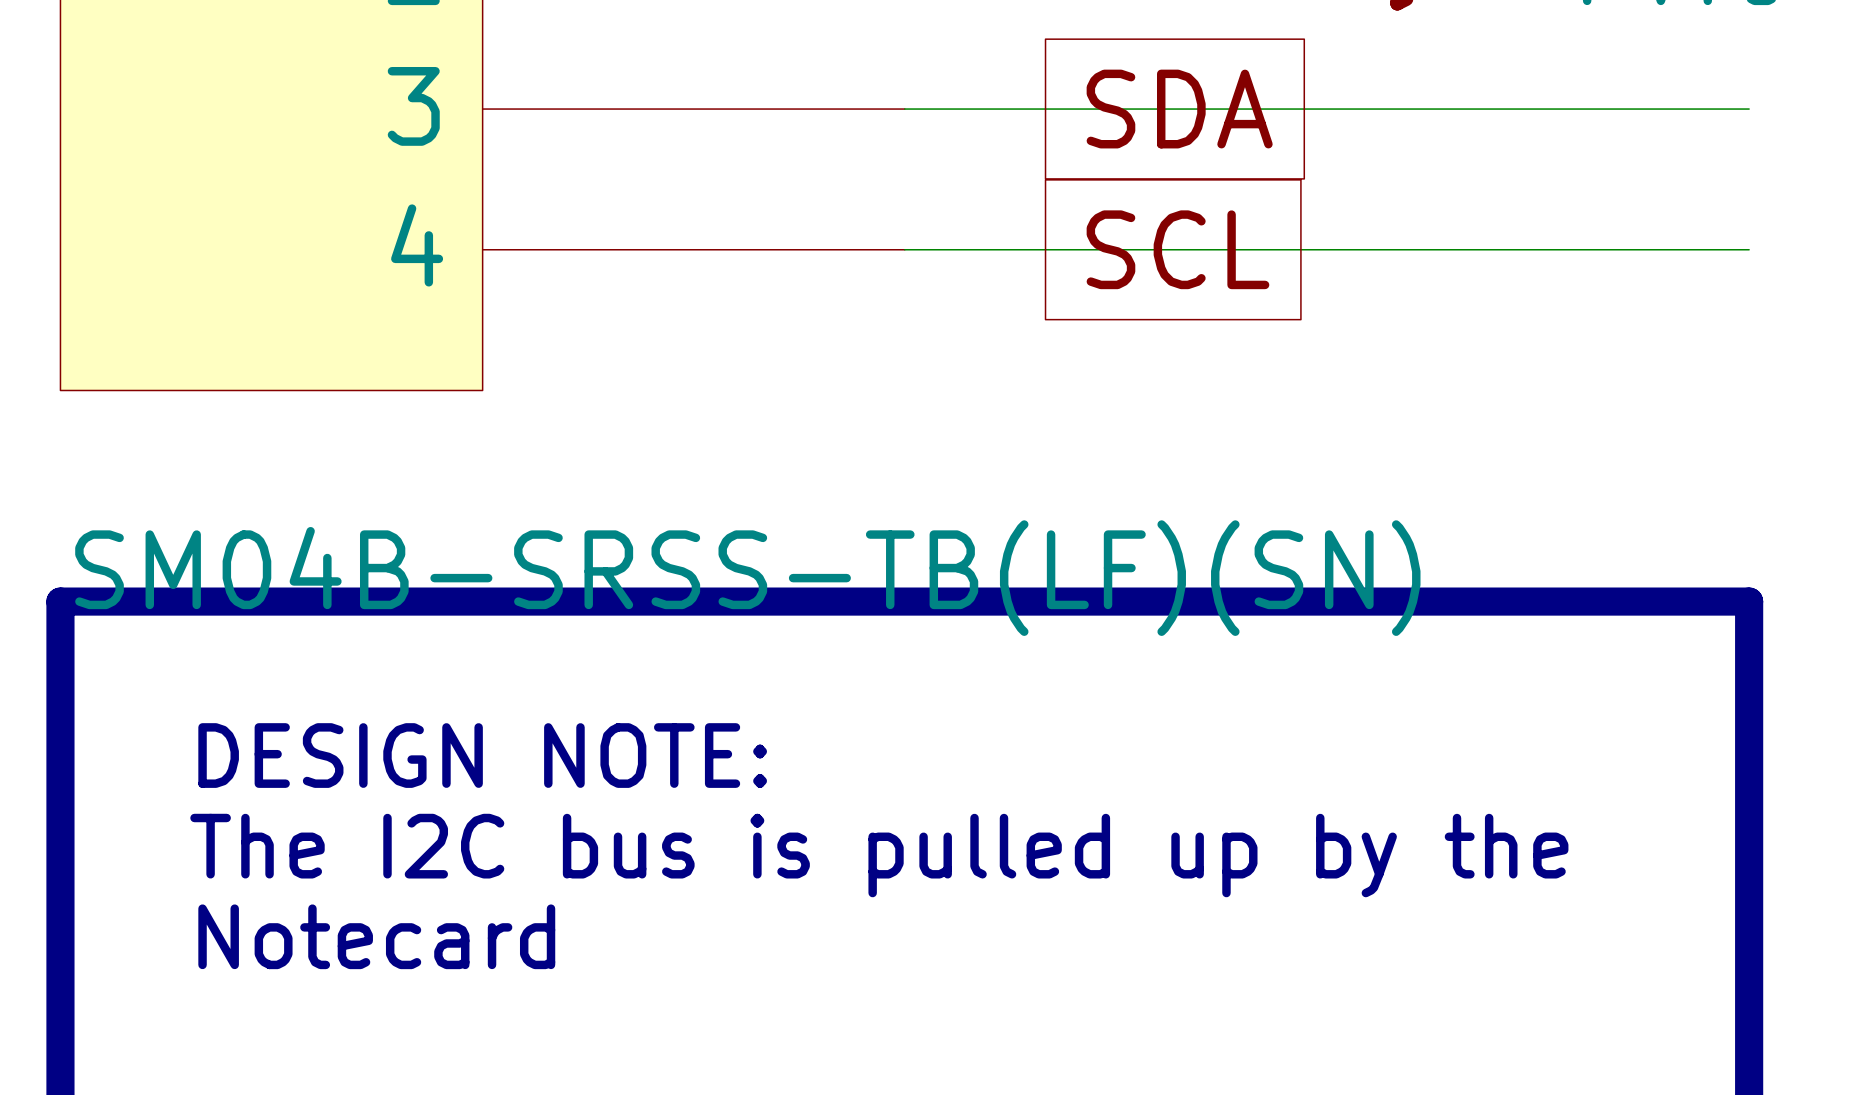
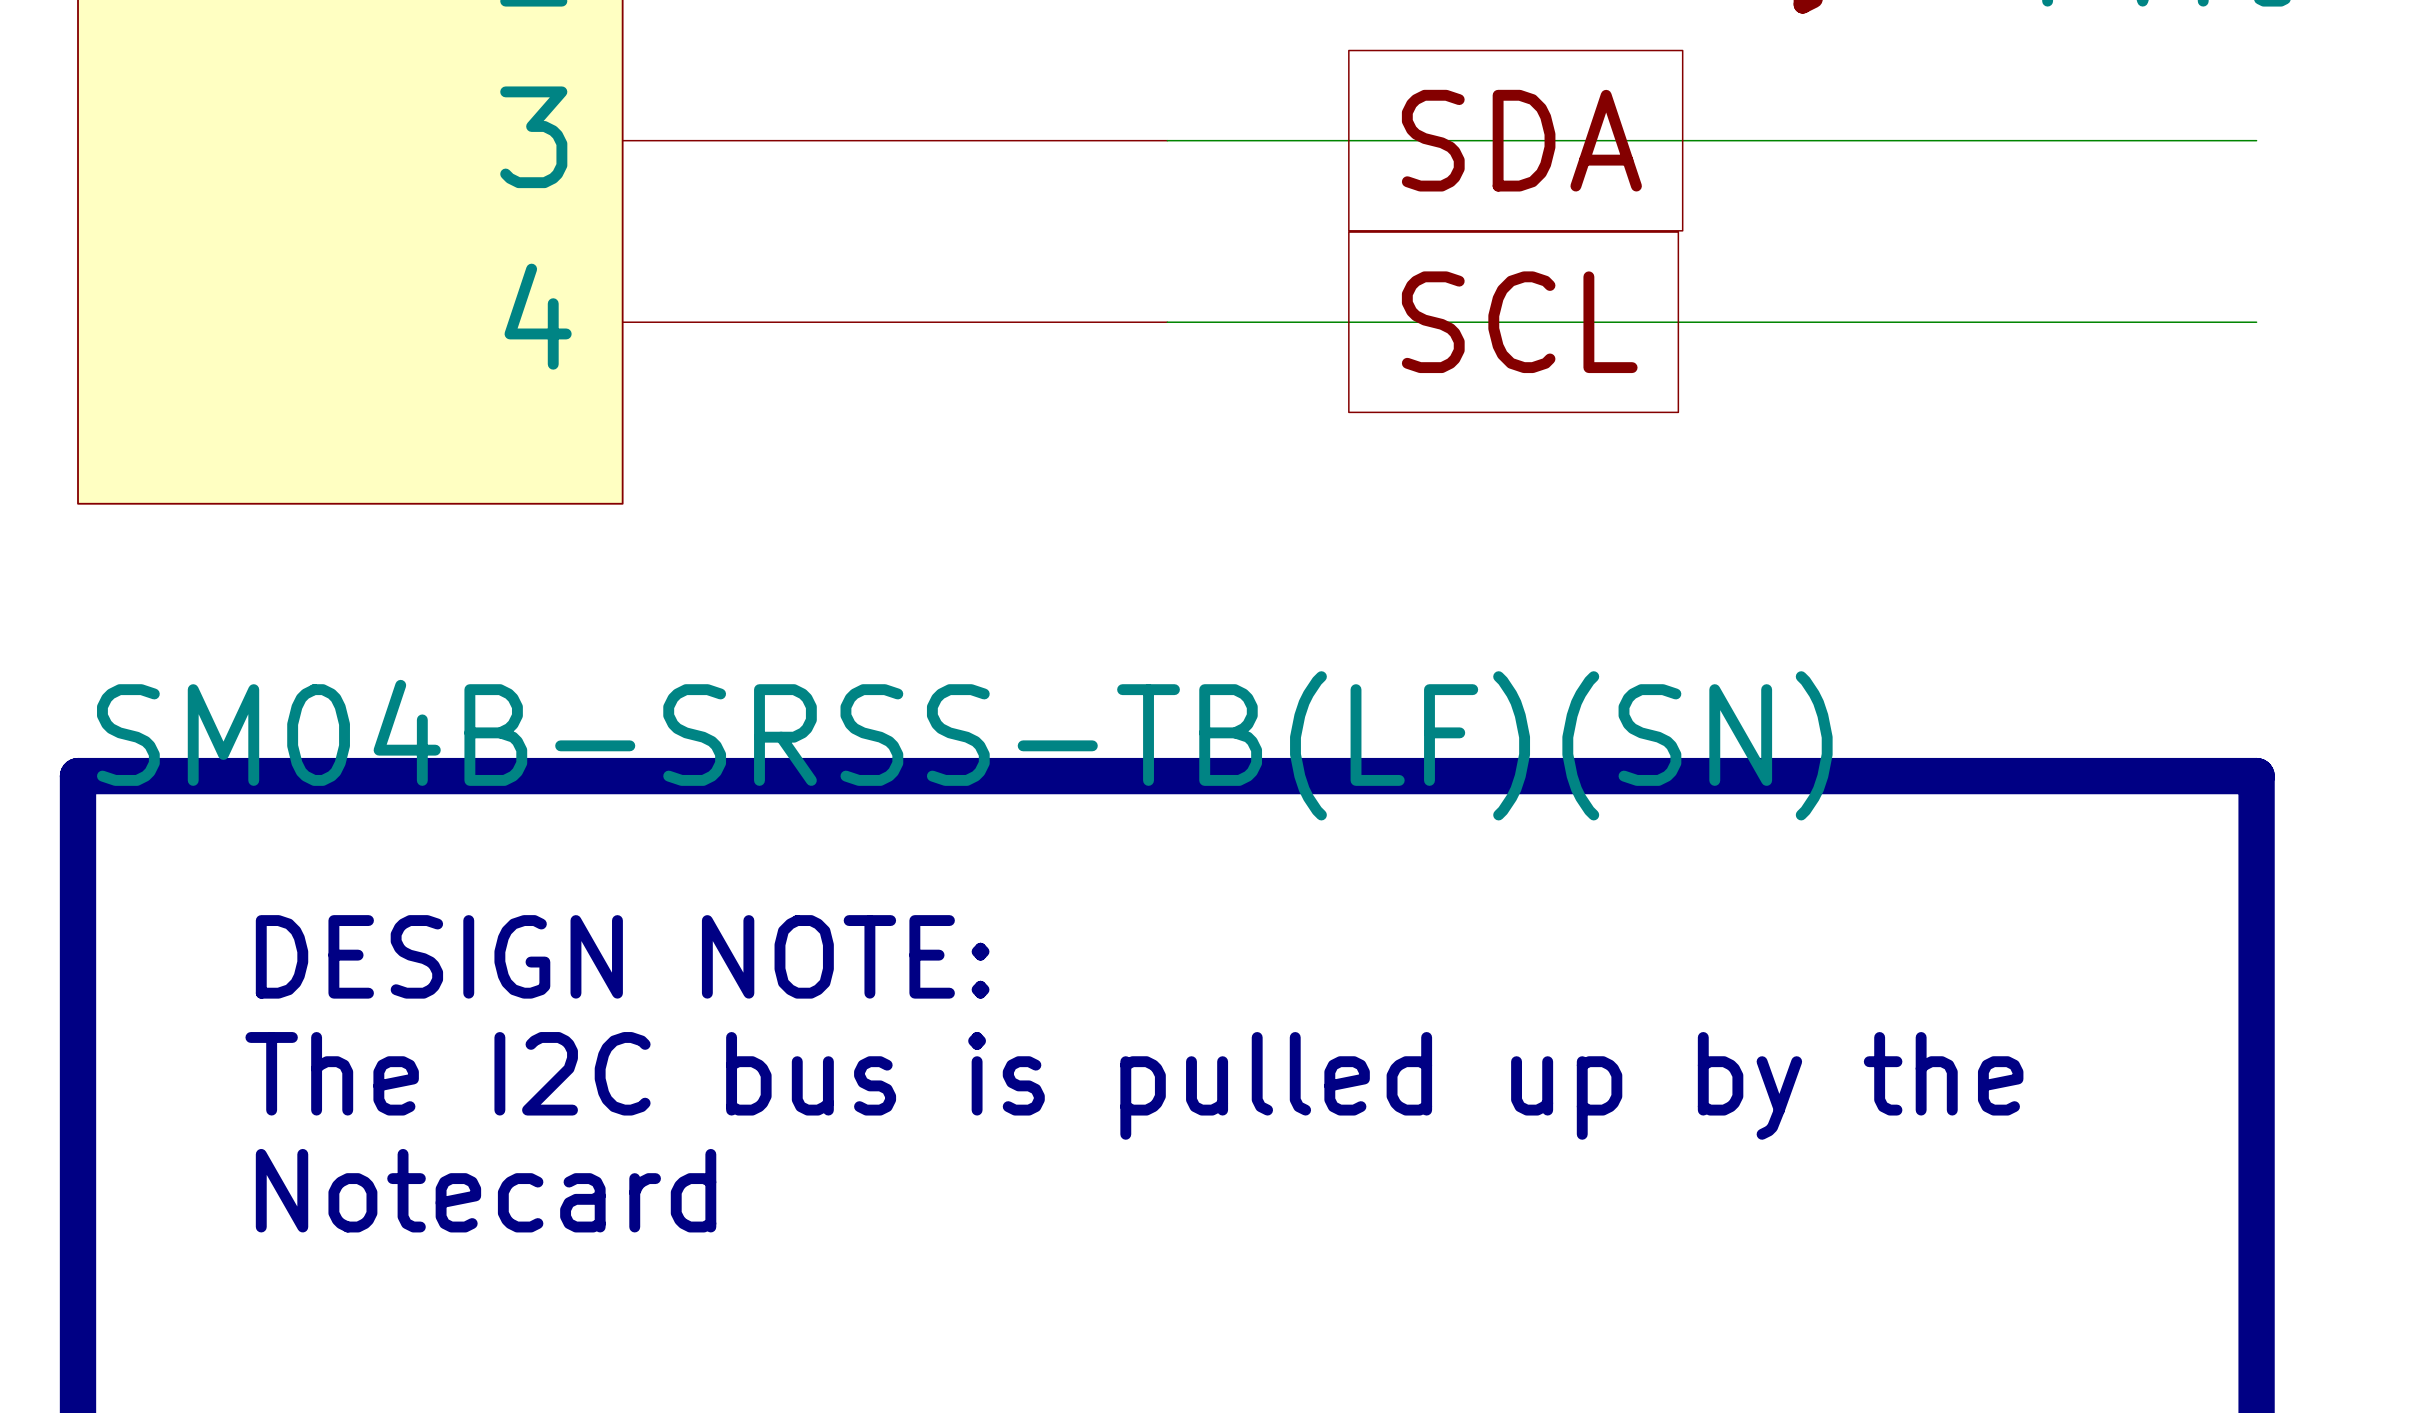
text position: DESIGN NOTE: (482, 755) -> DESIGN NOTE: (622, 956)
text position: The I2C bus is pulled up by the (879, 855) -> The I2C bus is pulled up by the (1134, 1085)
text position: Notecard (376, 936) -> Notecard (486, 1190)

